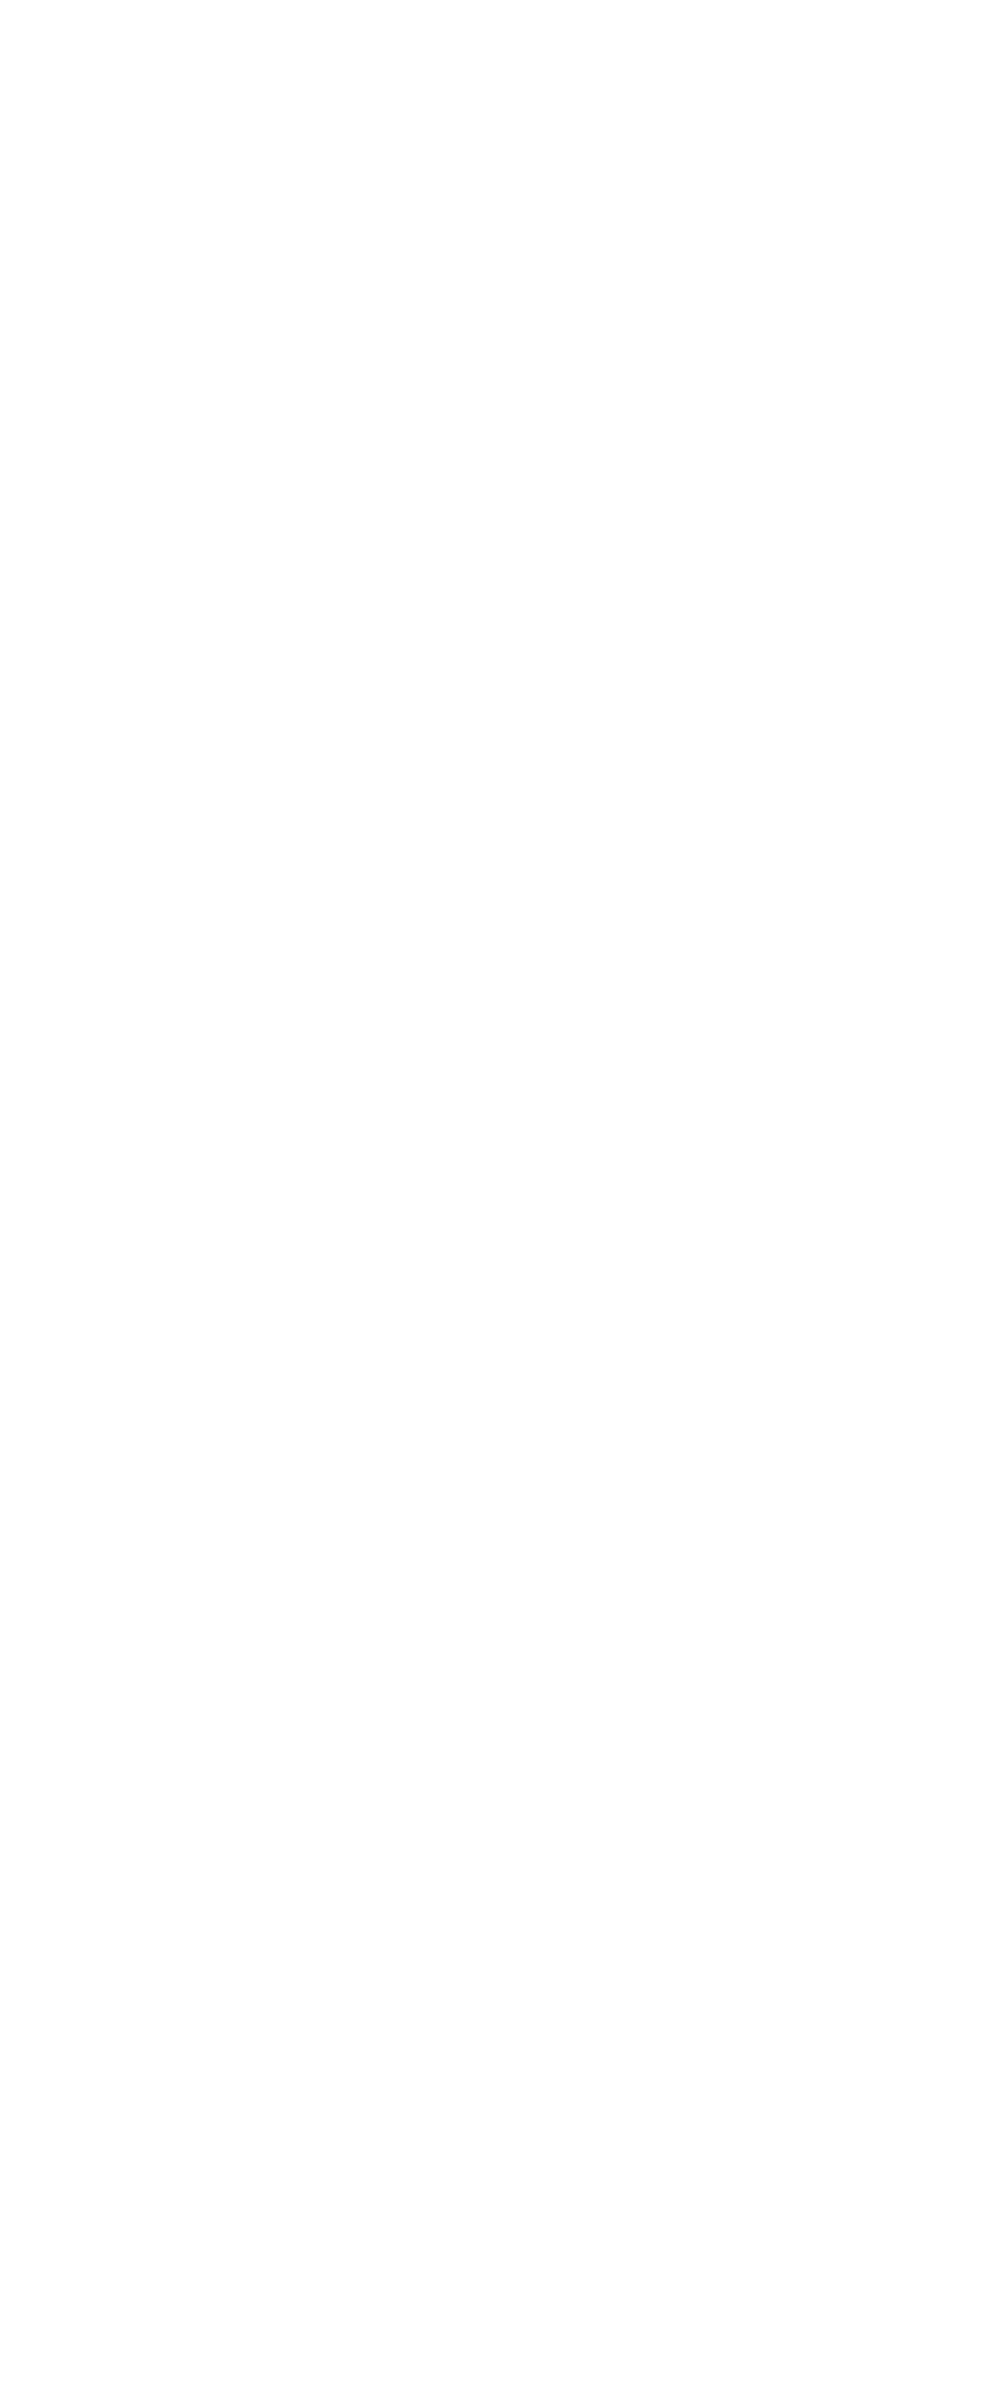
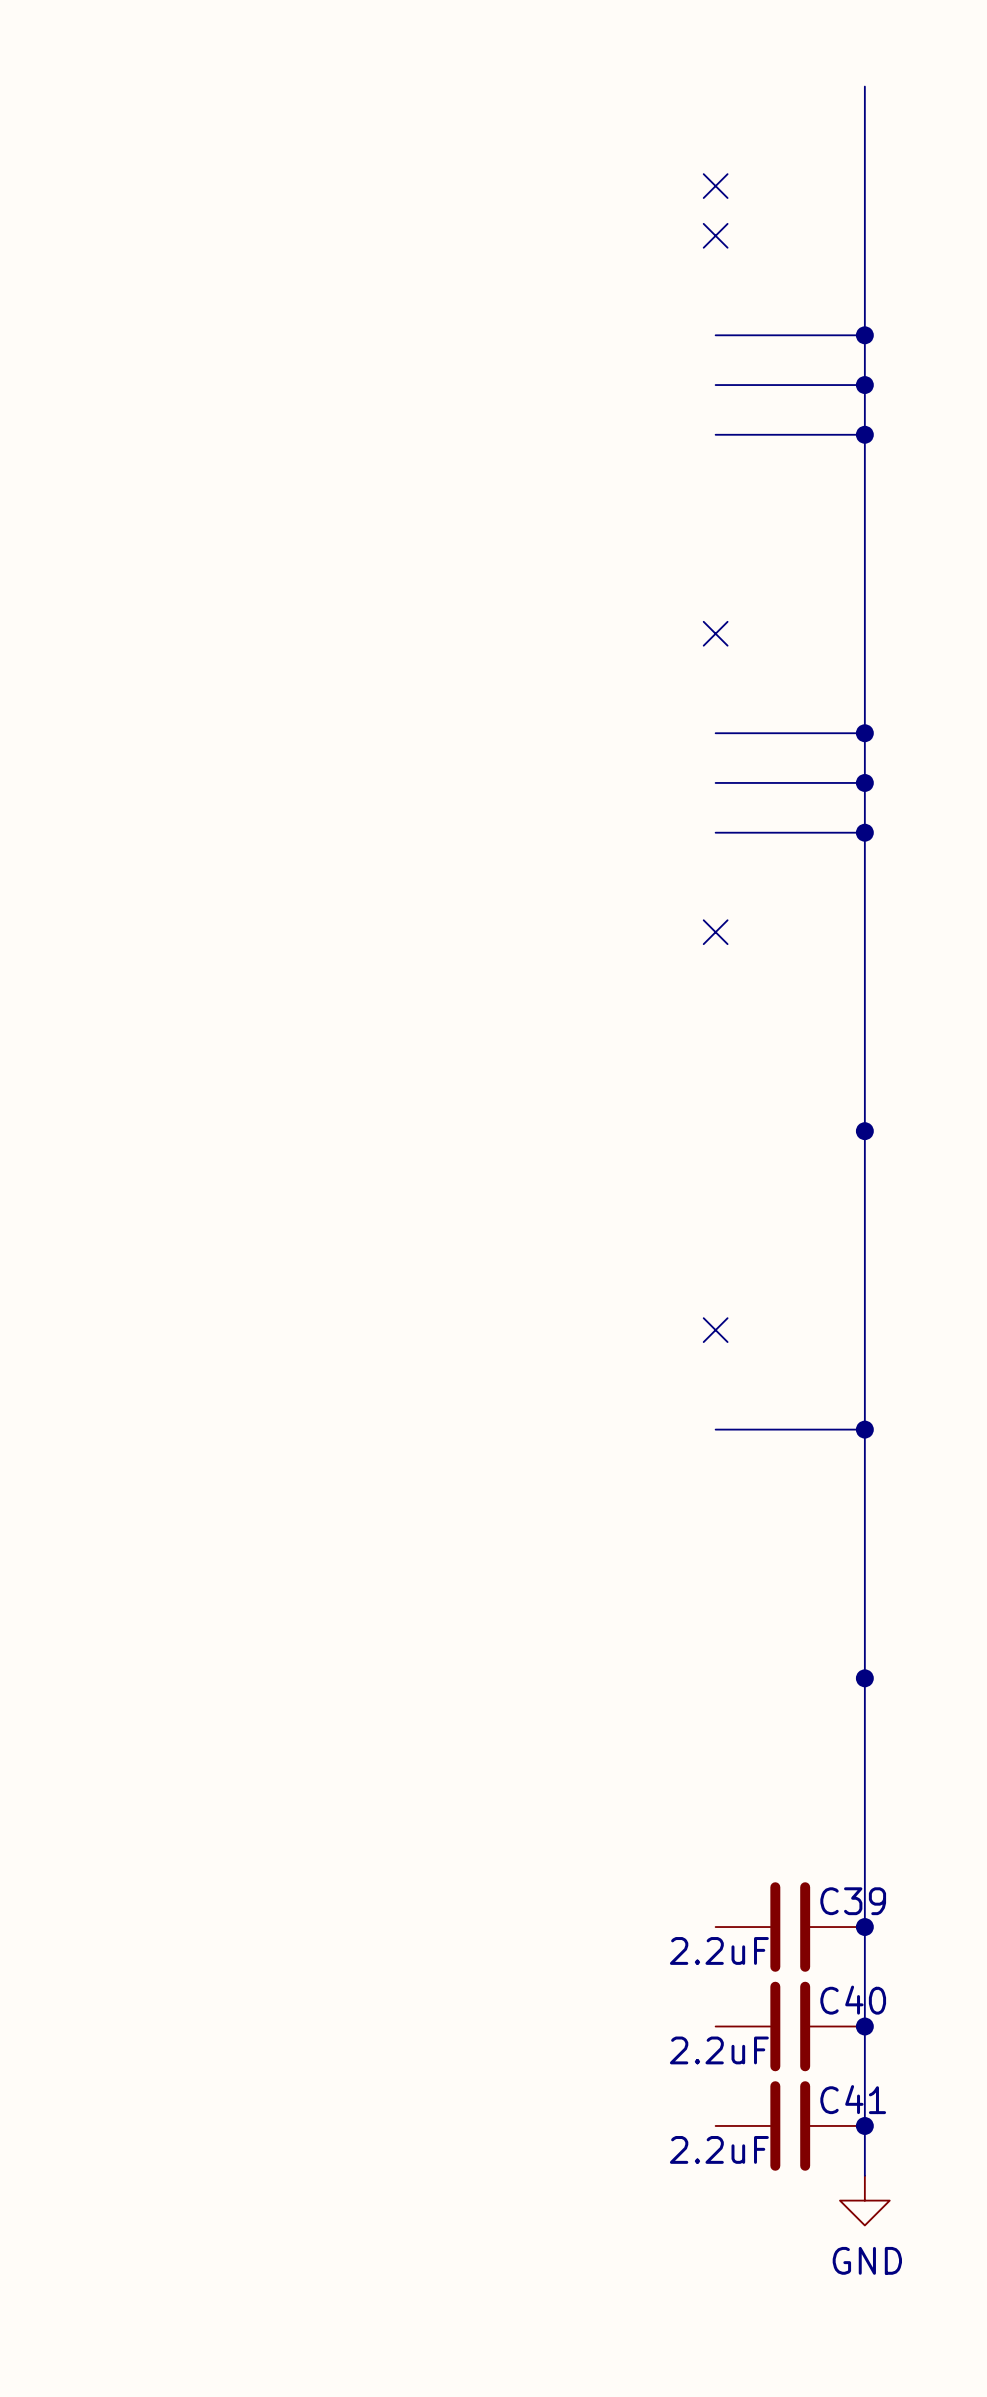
wire: none -> (864, 86) (864, 2175)
no-connect mark: none -> (715, 186)
no-connect mark: none -> (715, 235)
wire: none -> (715, 335) (864, 335)
junction: none -> (864, 335)
wire: none -> (715, 385) (864, 385)
junction: none -> (864, 385)
wire: none -> (715, 434) (864, 434)
junction: none -> (864, 434)
no-connect mark: none -> (715, 633)
wire: none -> (715, 733) (864, 733)
junction: none -> (864, 733)
wire: none -> (715, 782) (864, 782)
junction: none -> (864, 782)
wire: none -> (715, 832) (864, 832)
junction: none -> (864, 832)
no-connect mark: none -> (715, 932)
junction: none -> (864, 1131)
no-connect mark: none -> (715, 1330)
wire: none -> (715, 1429) (864, 1429)
junction: none -> (864, 1429)
junction: none -> (864, 1678)
C39: none -> 2.2uF (790, 1927)
junction: none -> (864, 1927)
C40: none -> 2.2uF (790, 2026)
junction: none -> (864, 2026)
C41: none -> 2.2uF (790, 2125)
junction: none -> (864, 2125)
power symbol: none -> GND (864, 2200)

